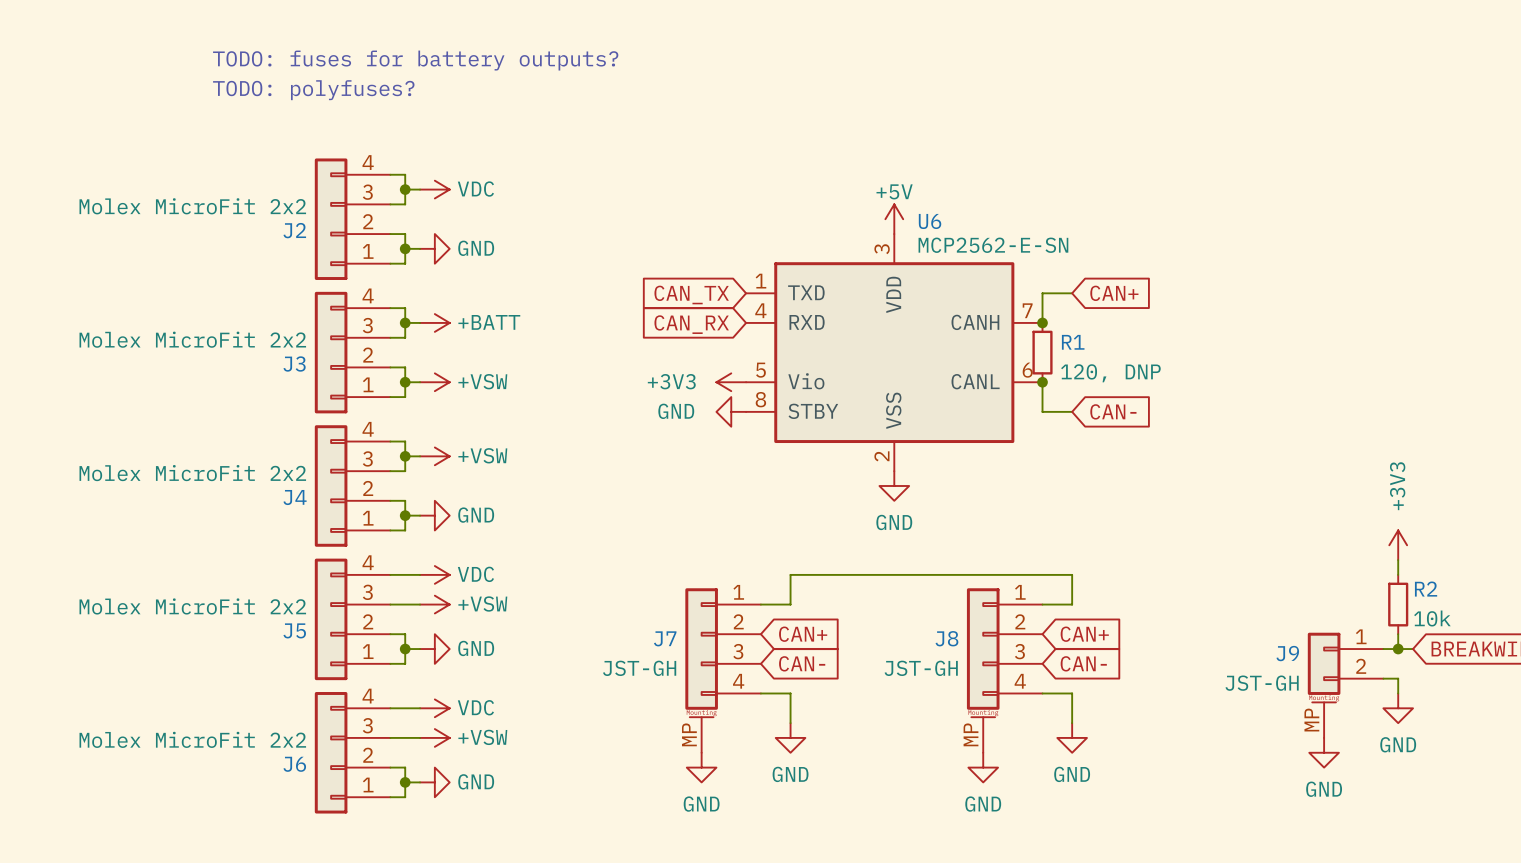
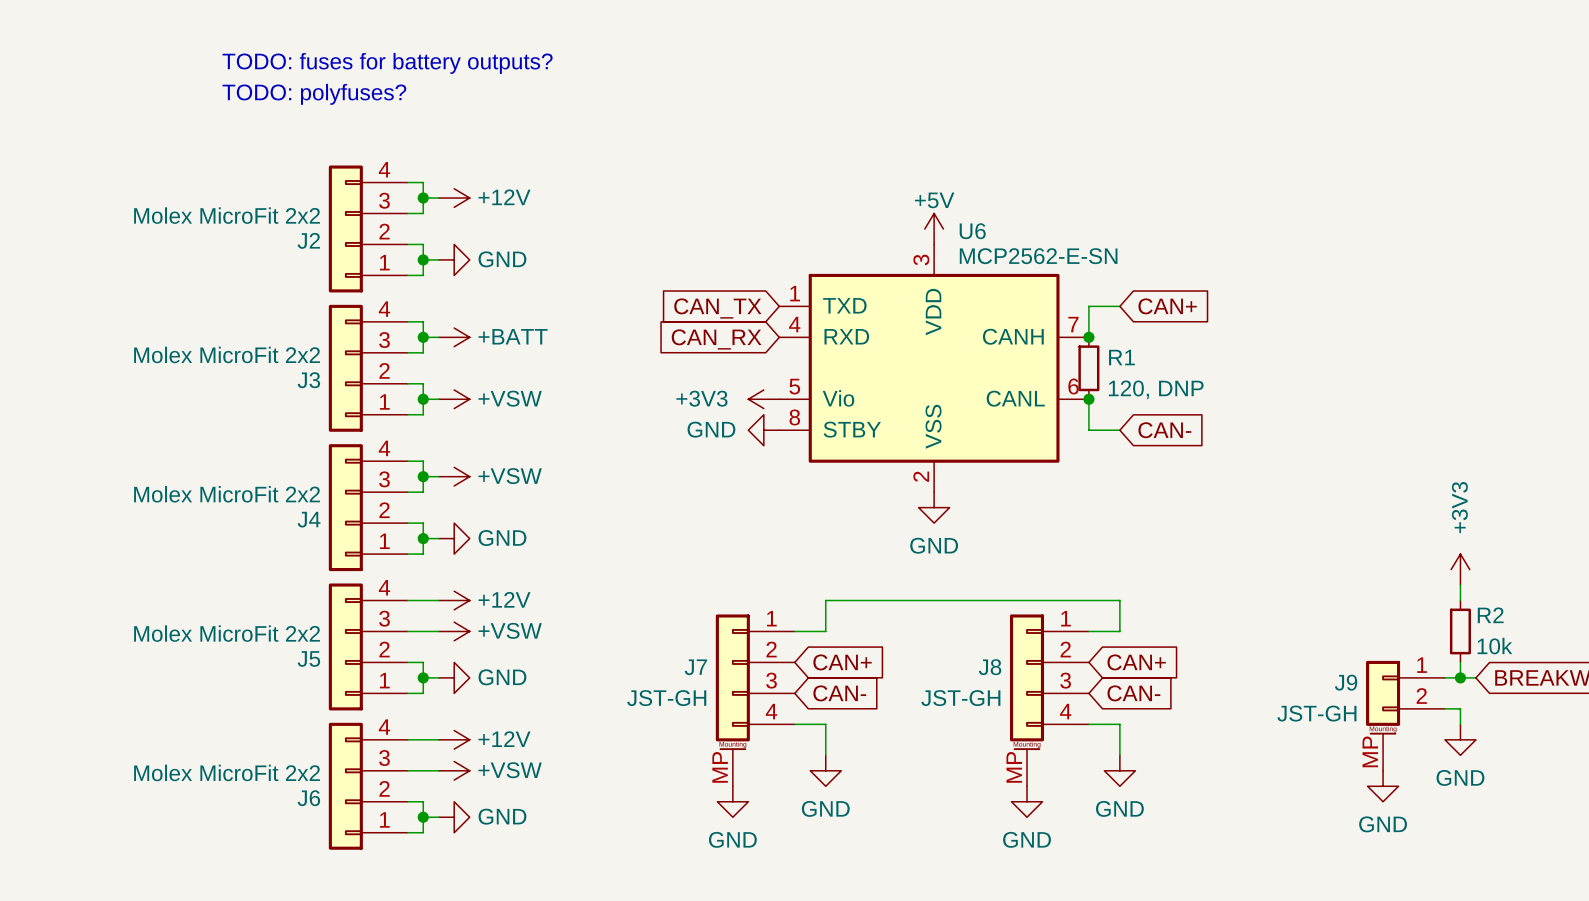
power symbol: VDC (434, 189) -> +12V (454, 198)
power symbol: VDC (434, 574) -> +12V (454, 600)
power symbol: VDC (434, 708) -> +12V (454, 739)

